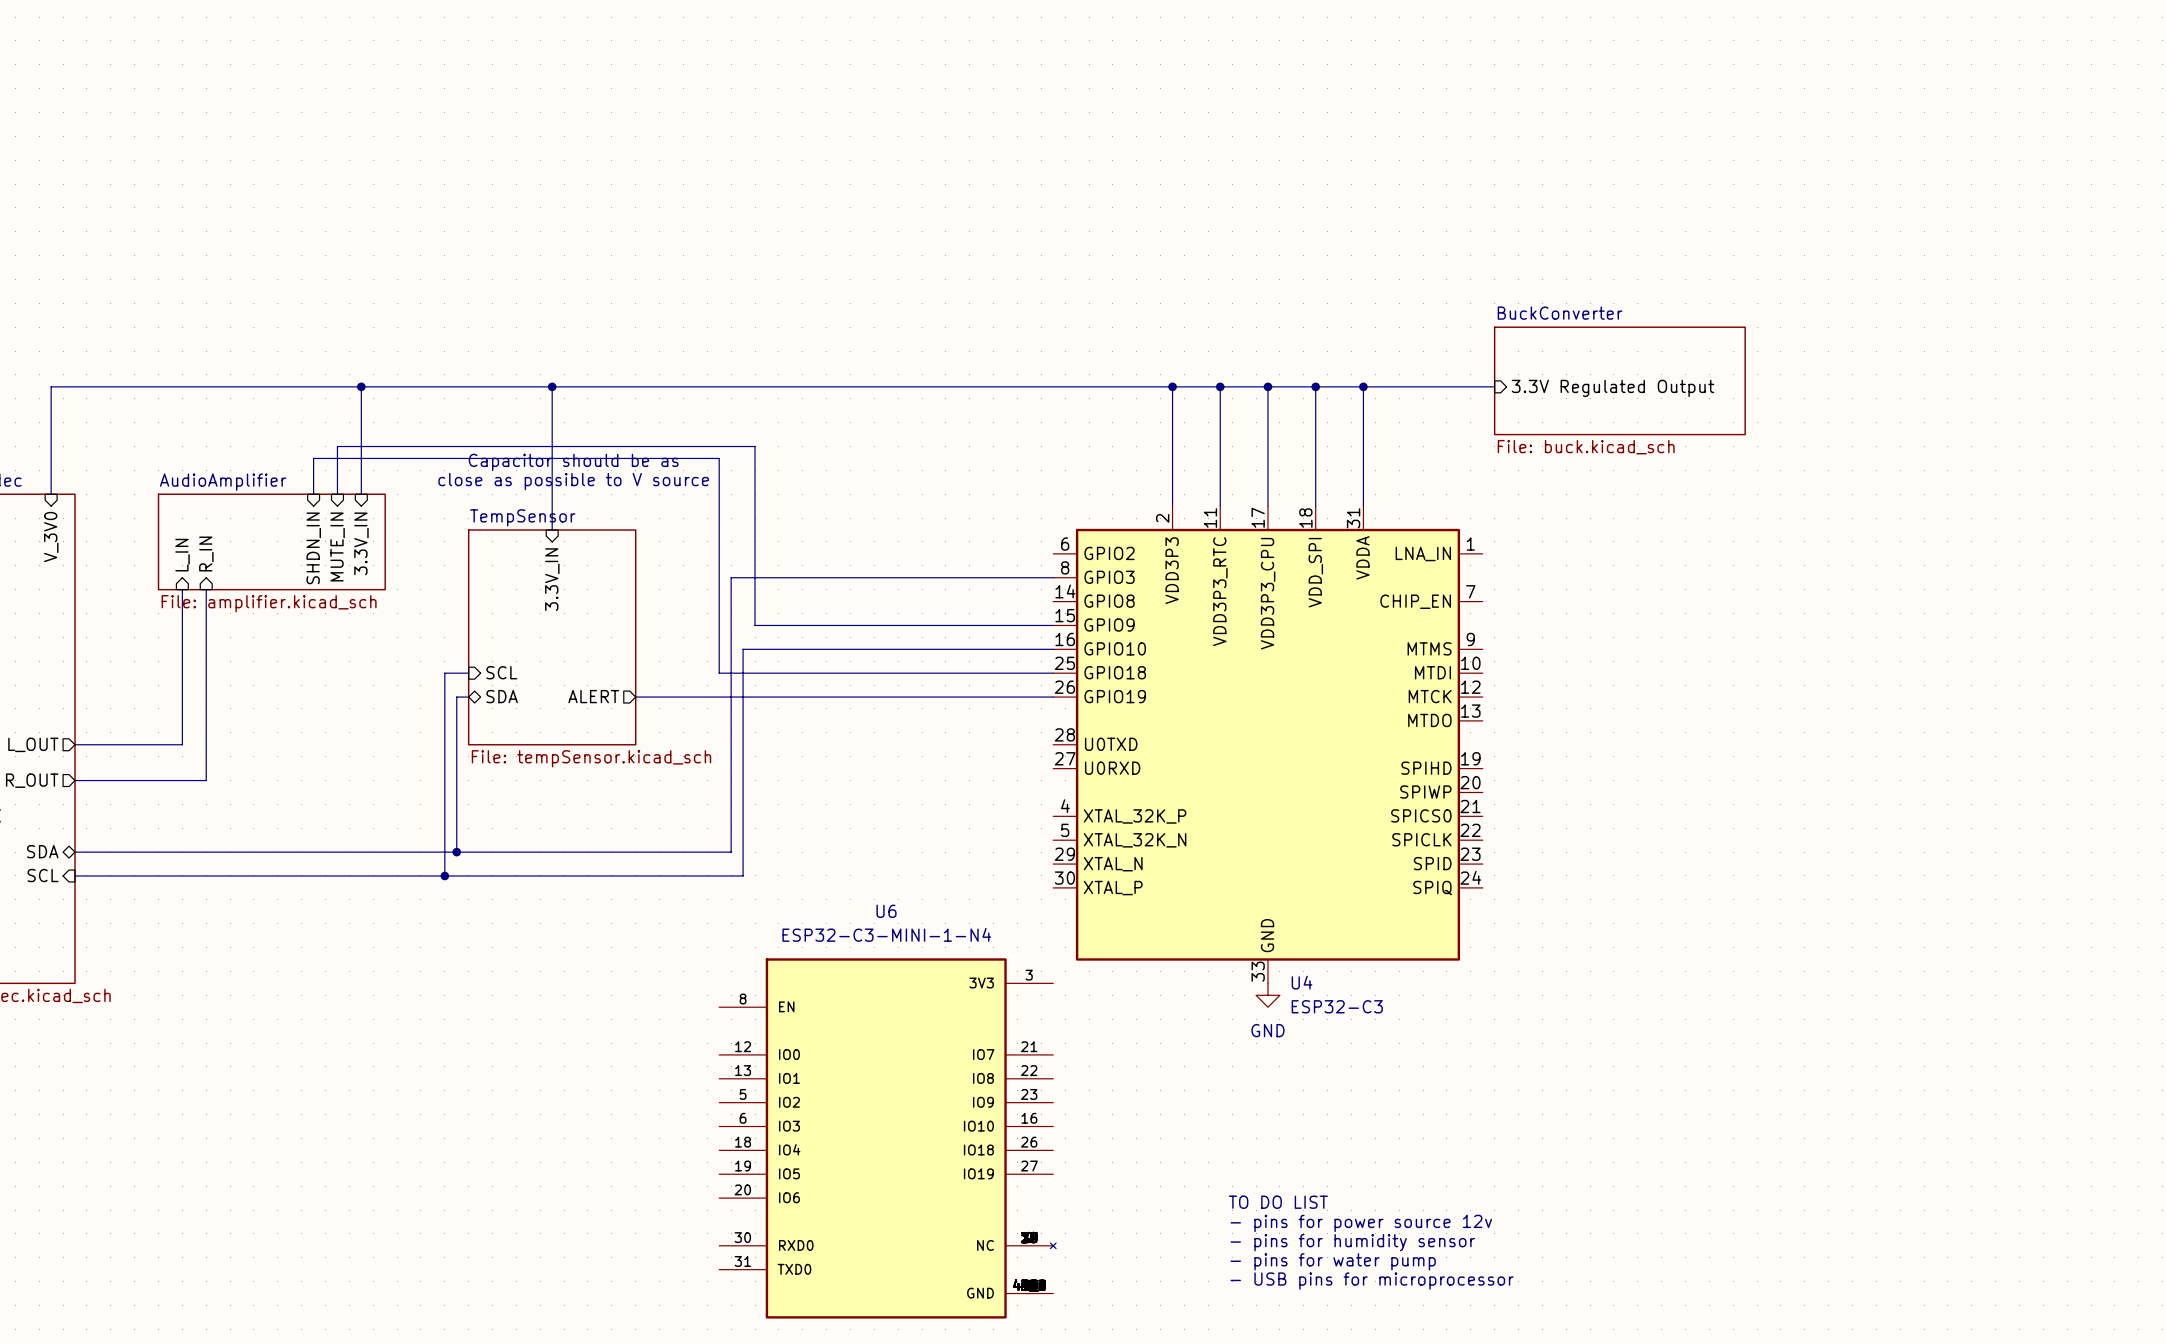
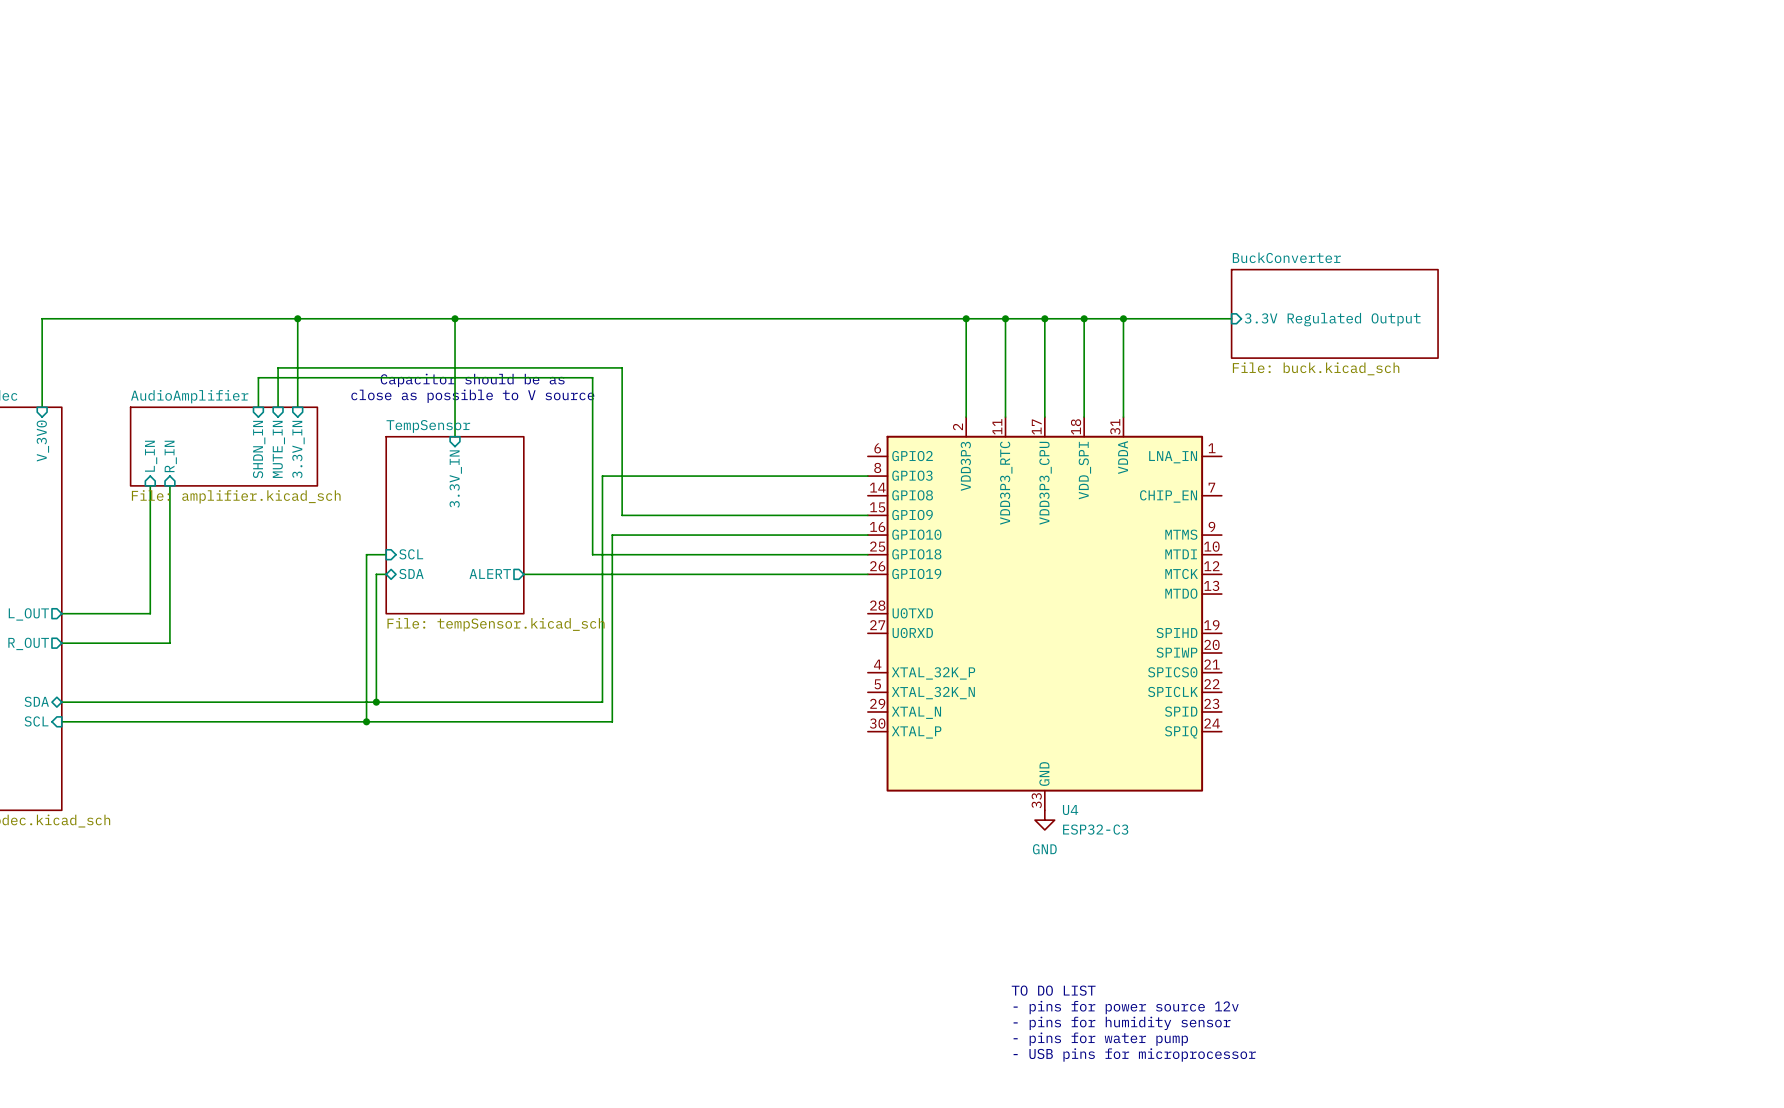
U6: ESP32-C3-MINI-1-N4 (887, 1138) -> none

